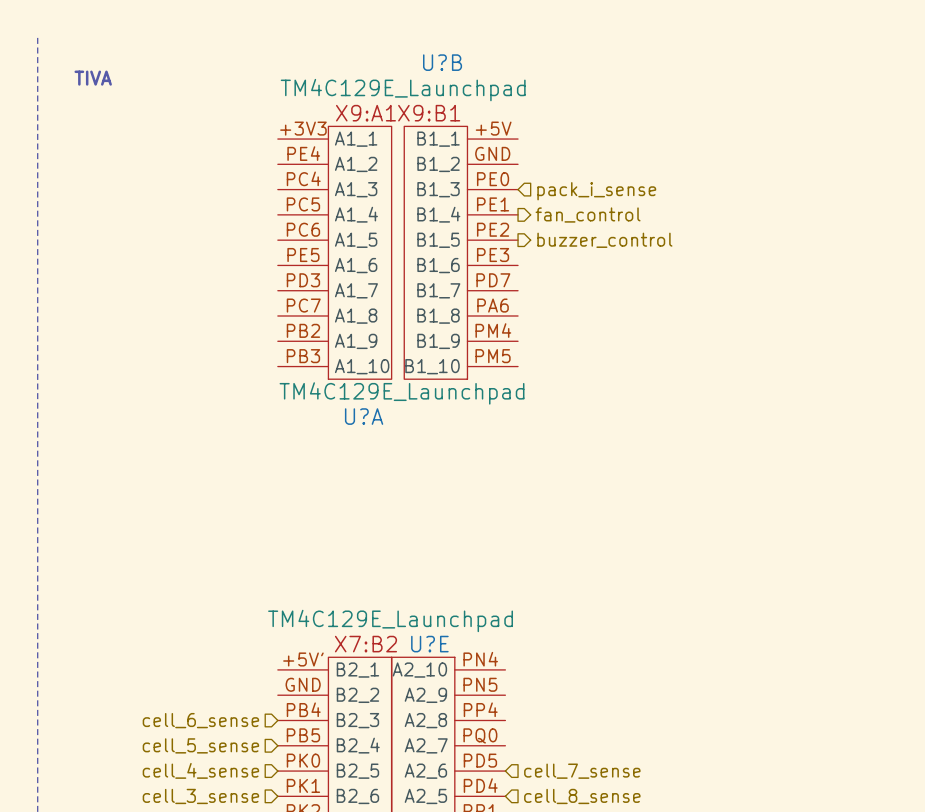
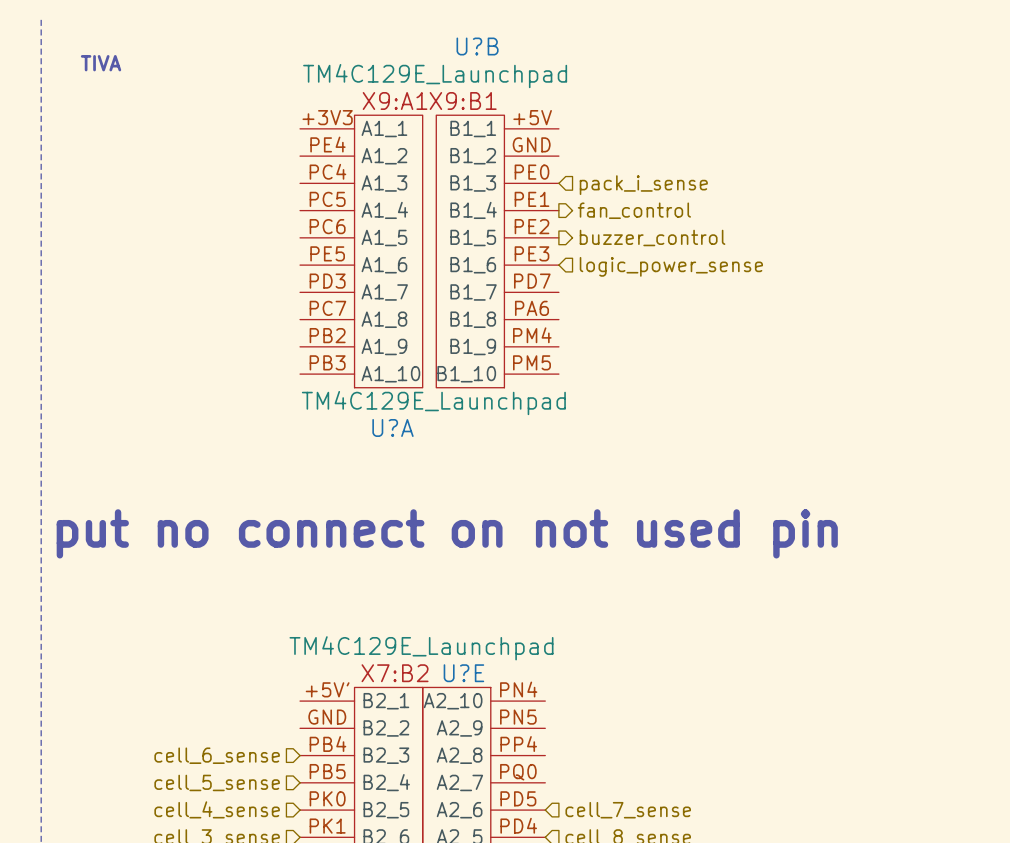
hierarchical label: none -> logic_power_sense (671, 266)
text: none -> put no connect on not used pin (447, 533)

